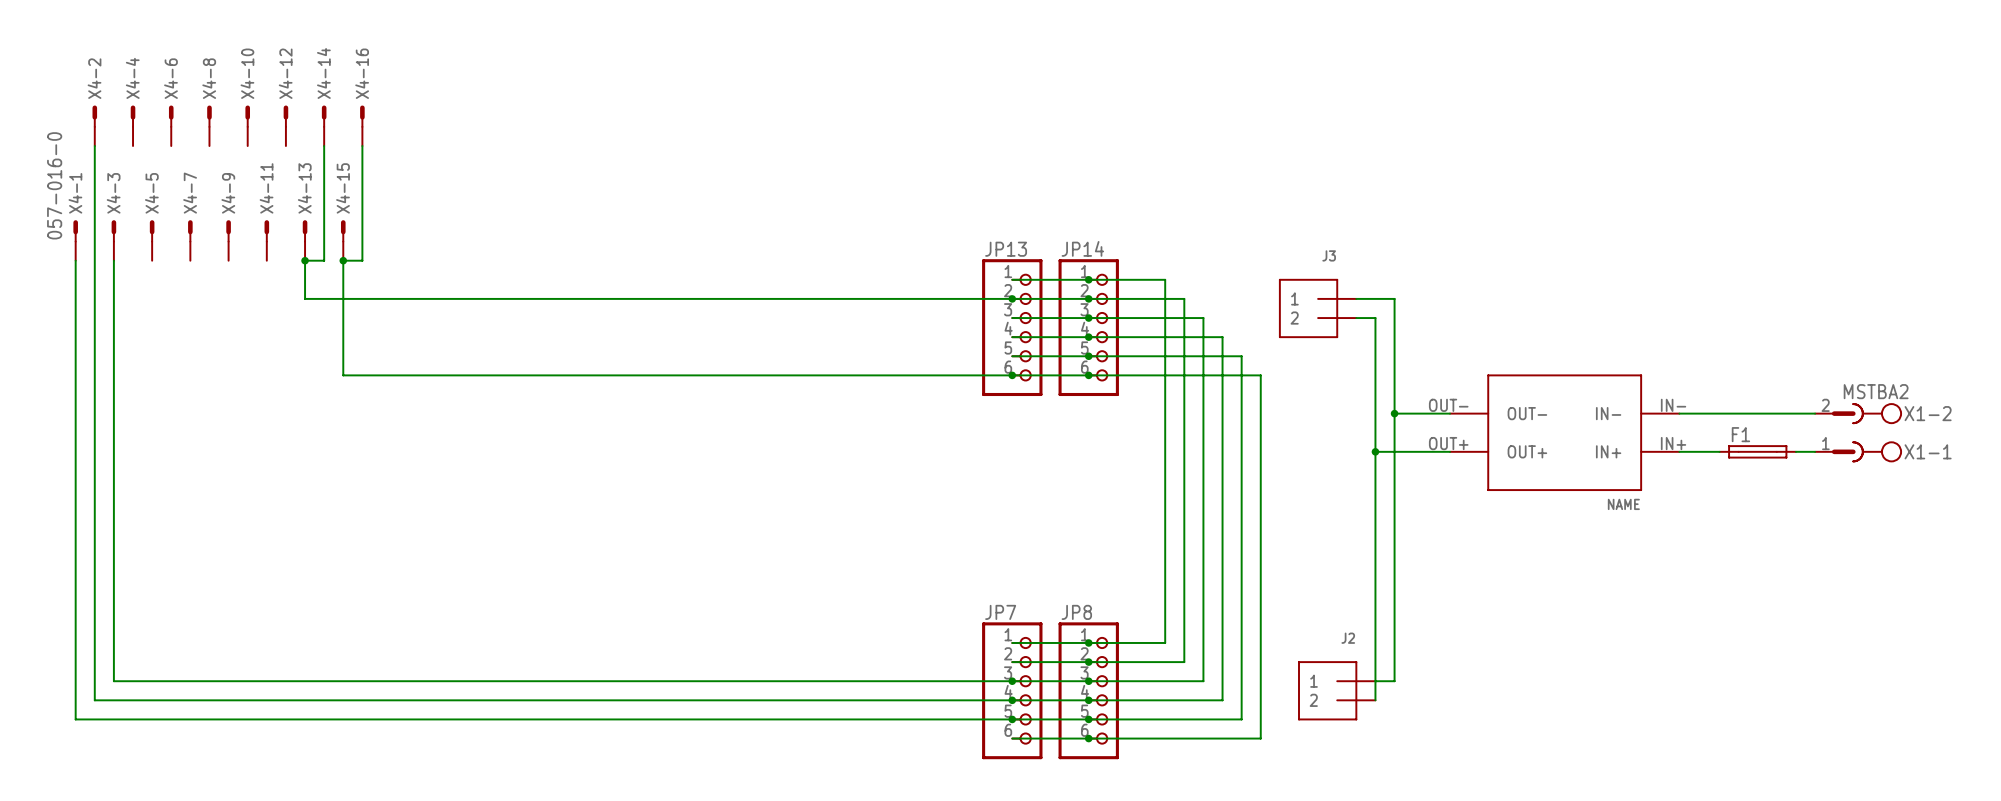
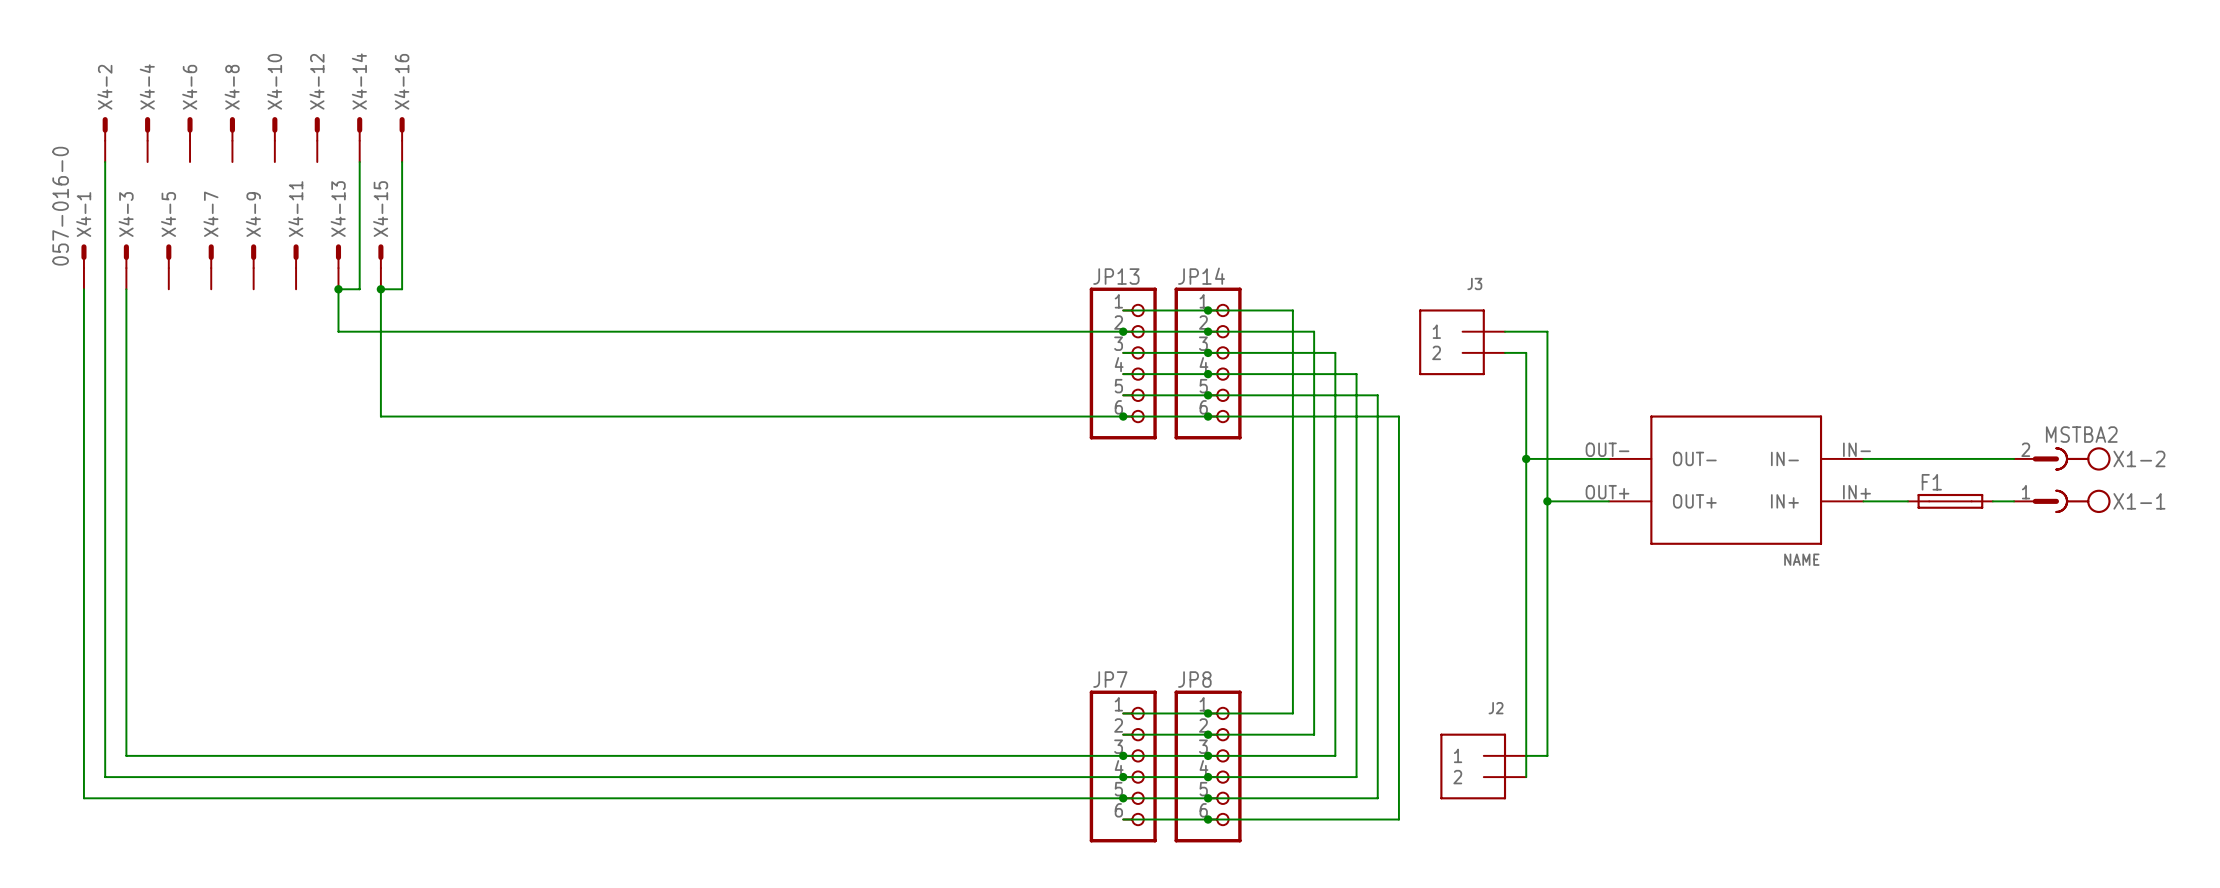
junction: none -> (1526, 458)
junction: (1394, 413) -> none
wire: (1375, 451) (1394, 451) -> (1526, 458) (1547, 458)
junction: (1375, 451) -> none
junction: none -> (1547, 501)

